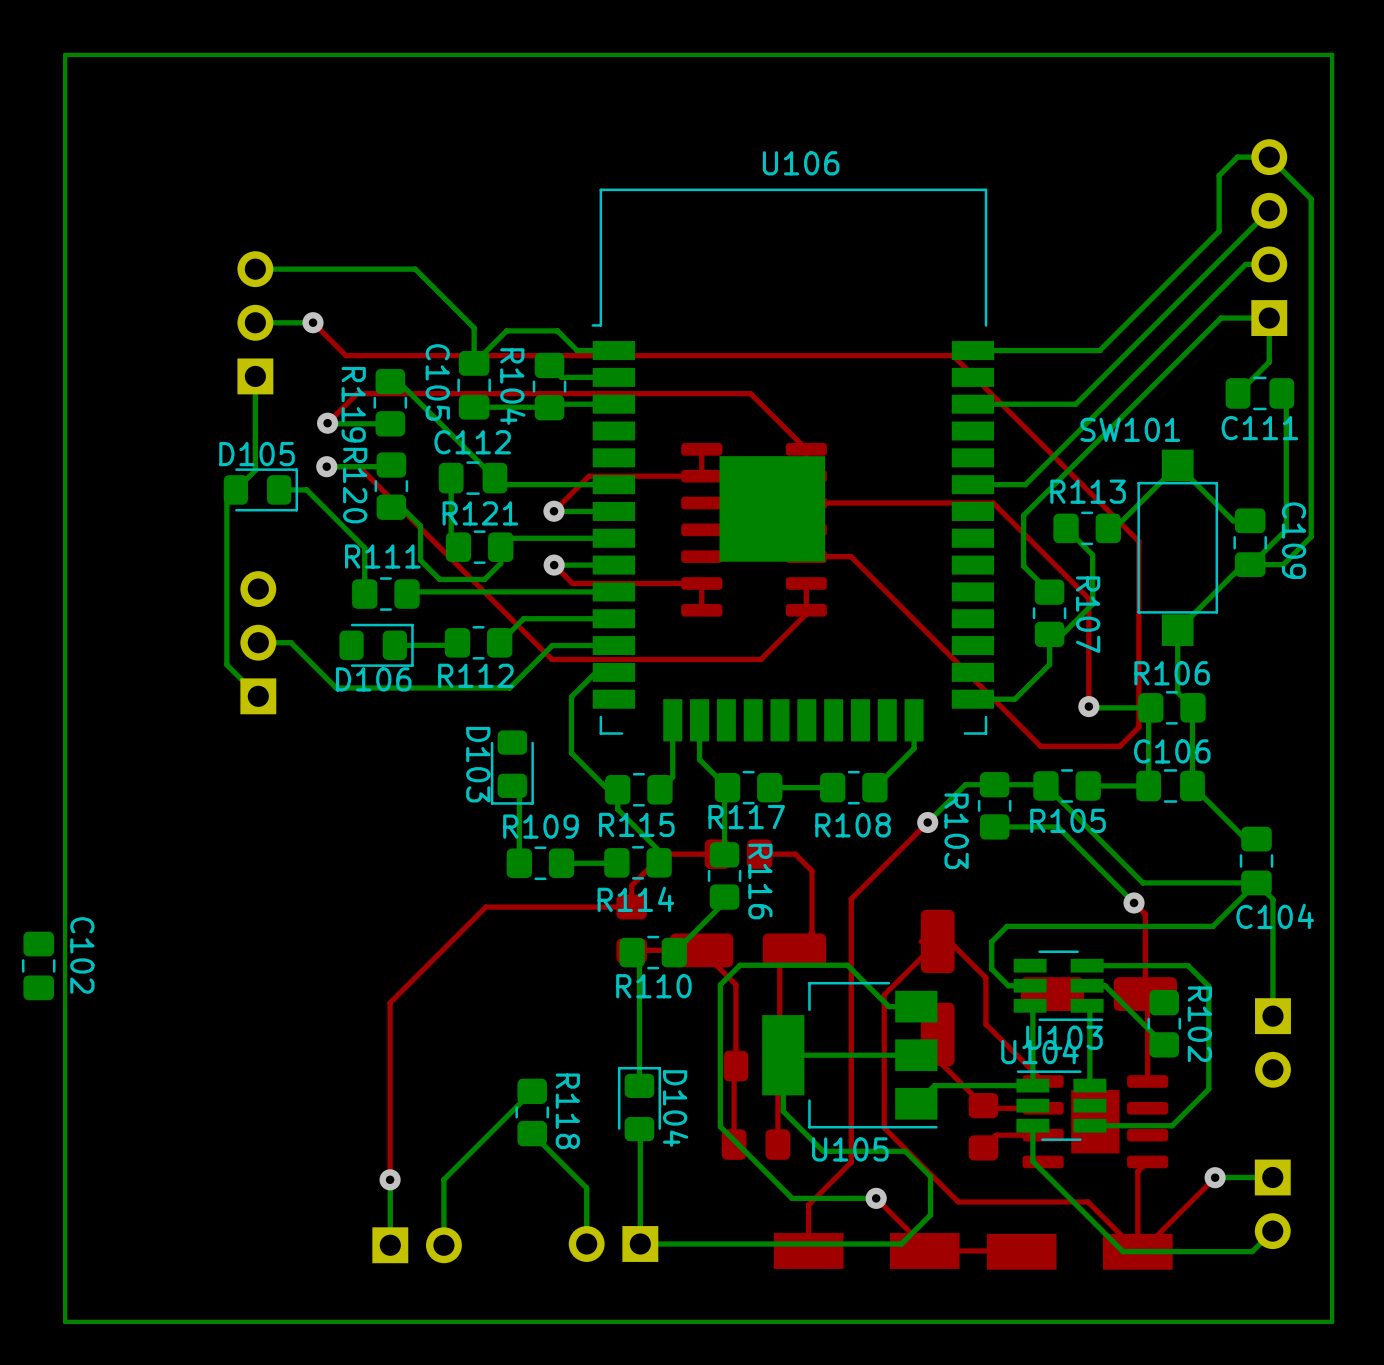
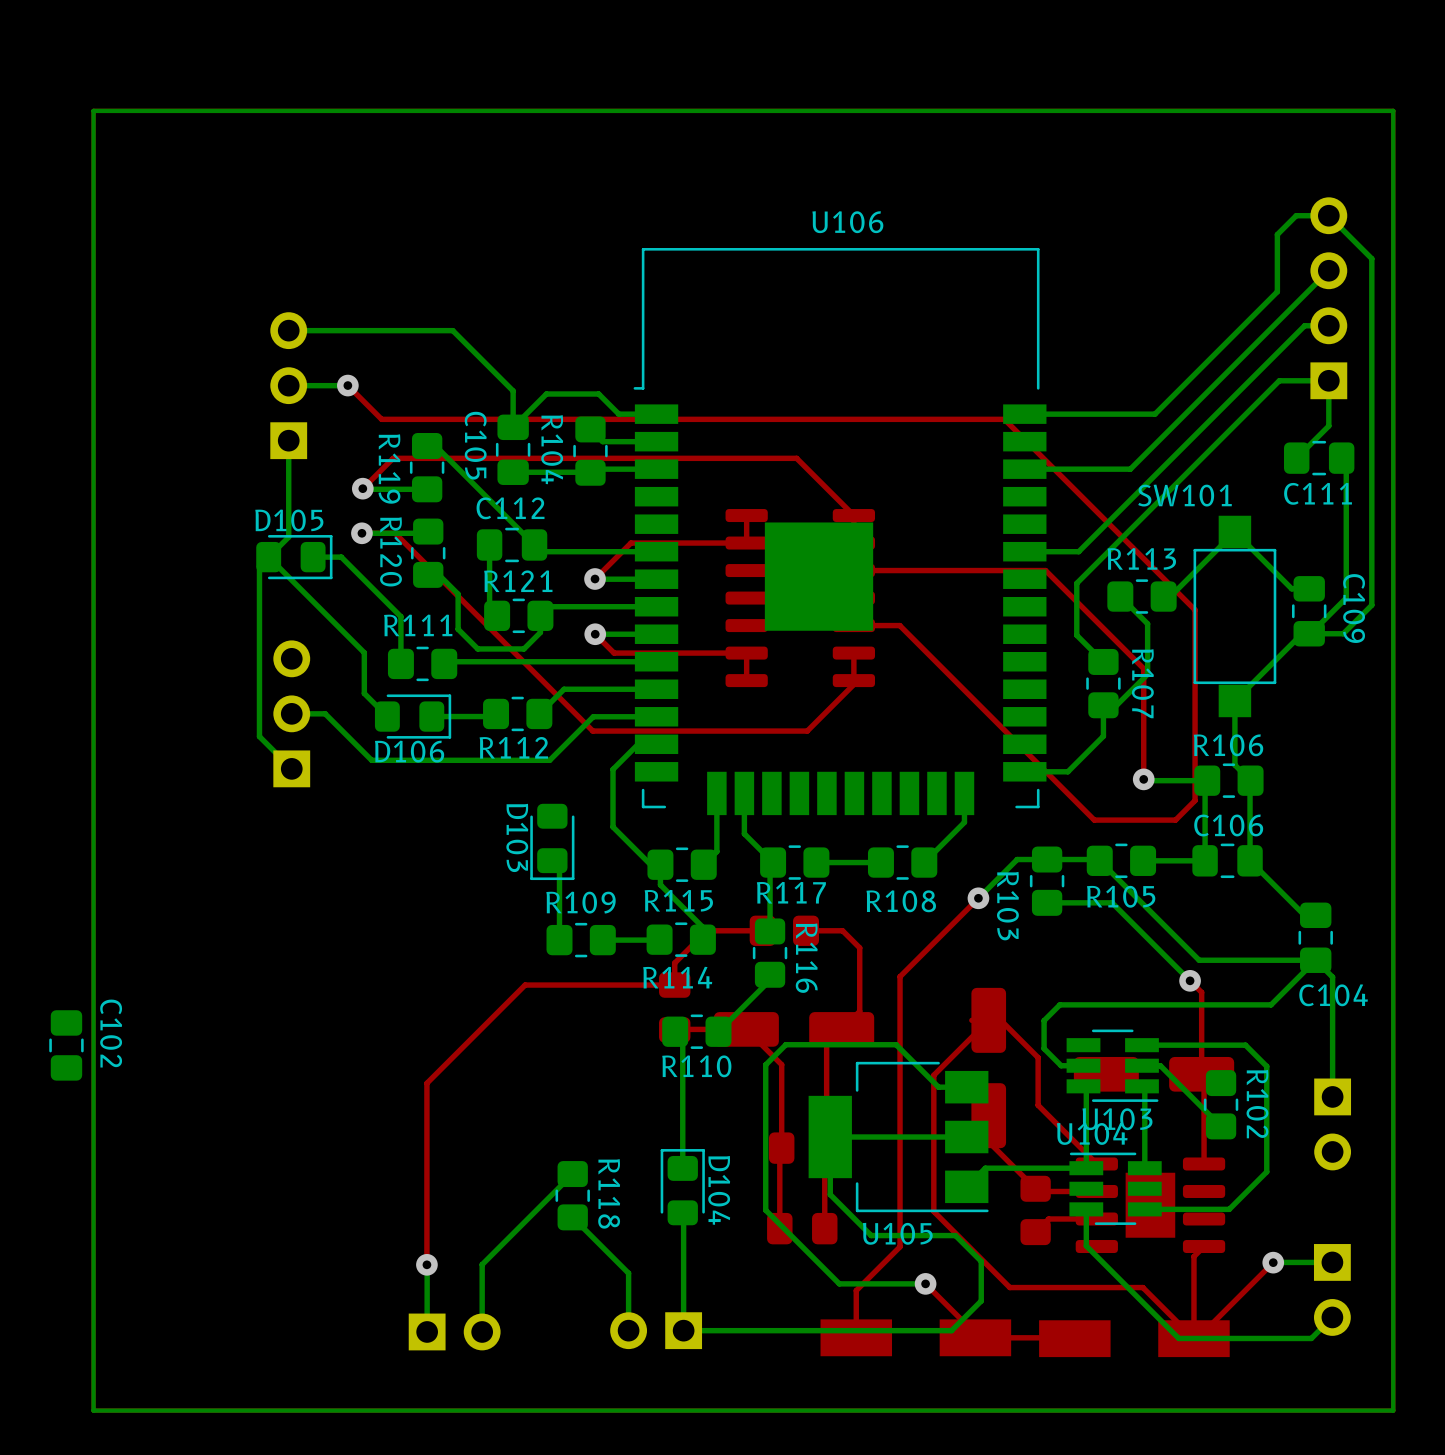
bottom track: none -> (268, 557) (364, 652) (364, 693) (387, 716)

